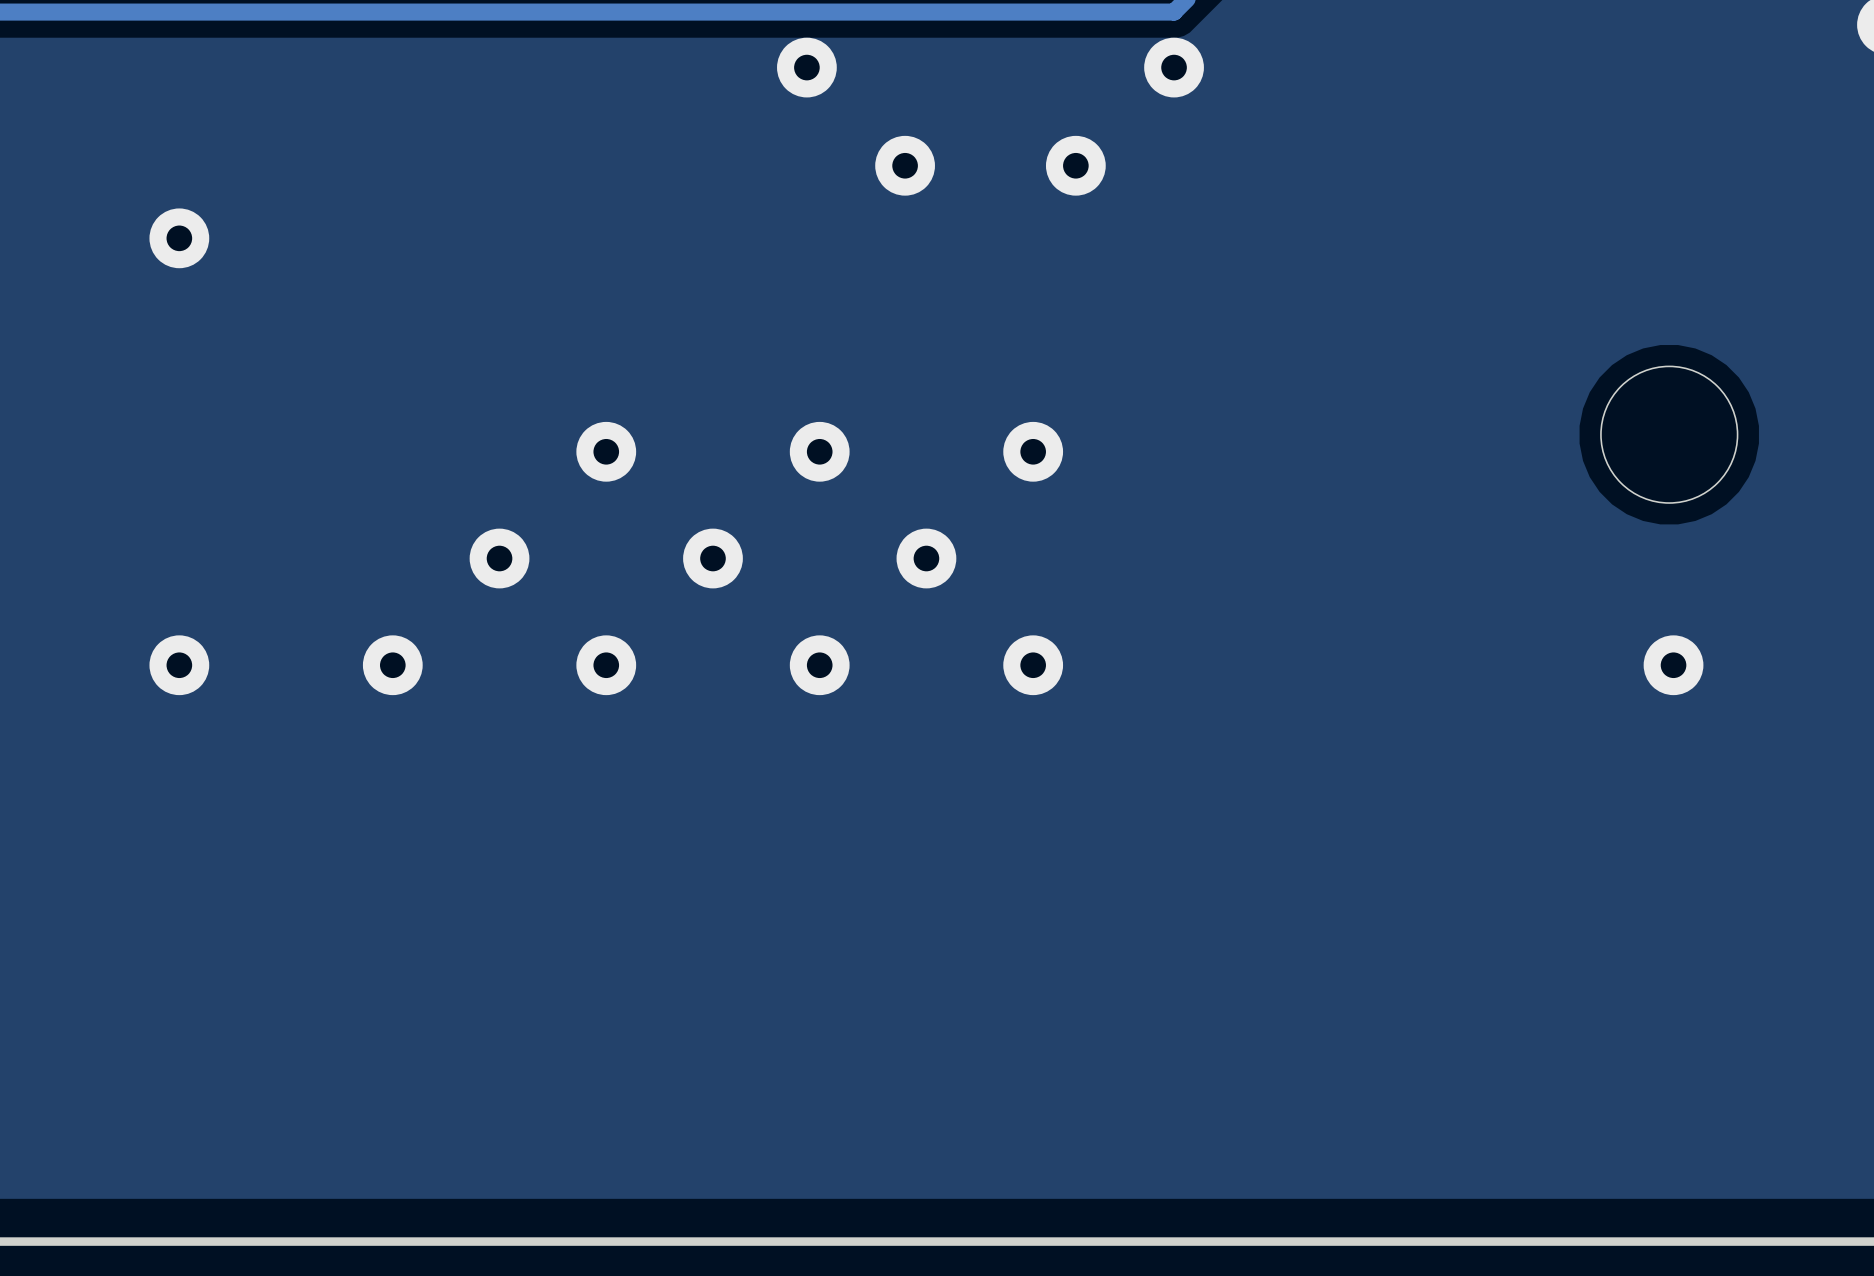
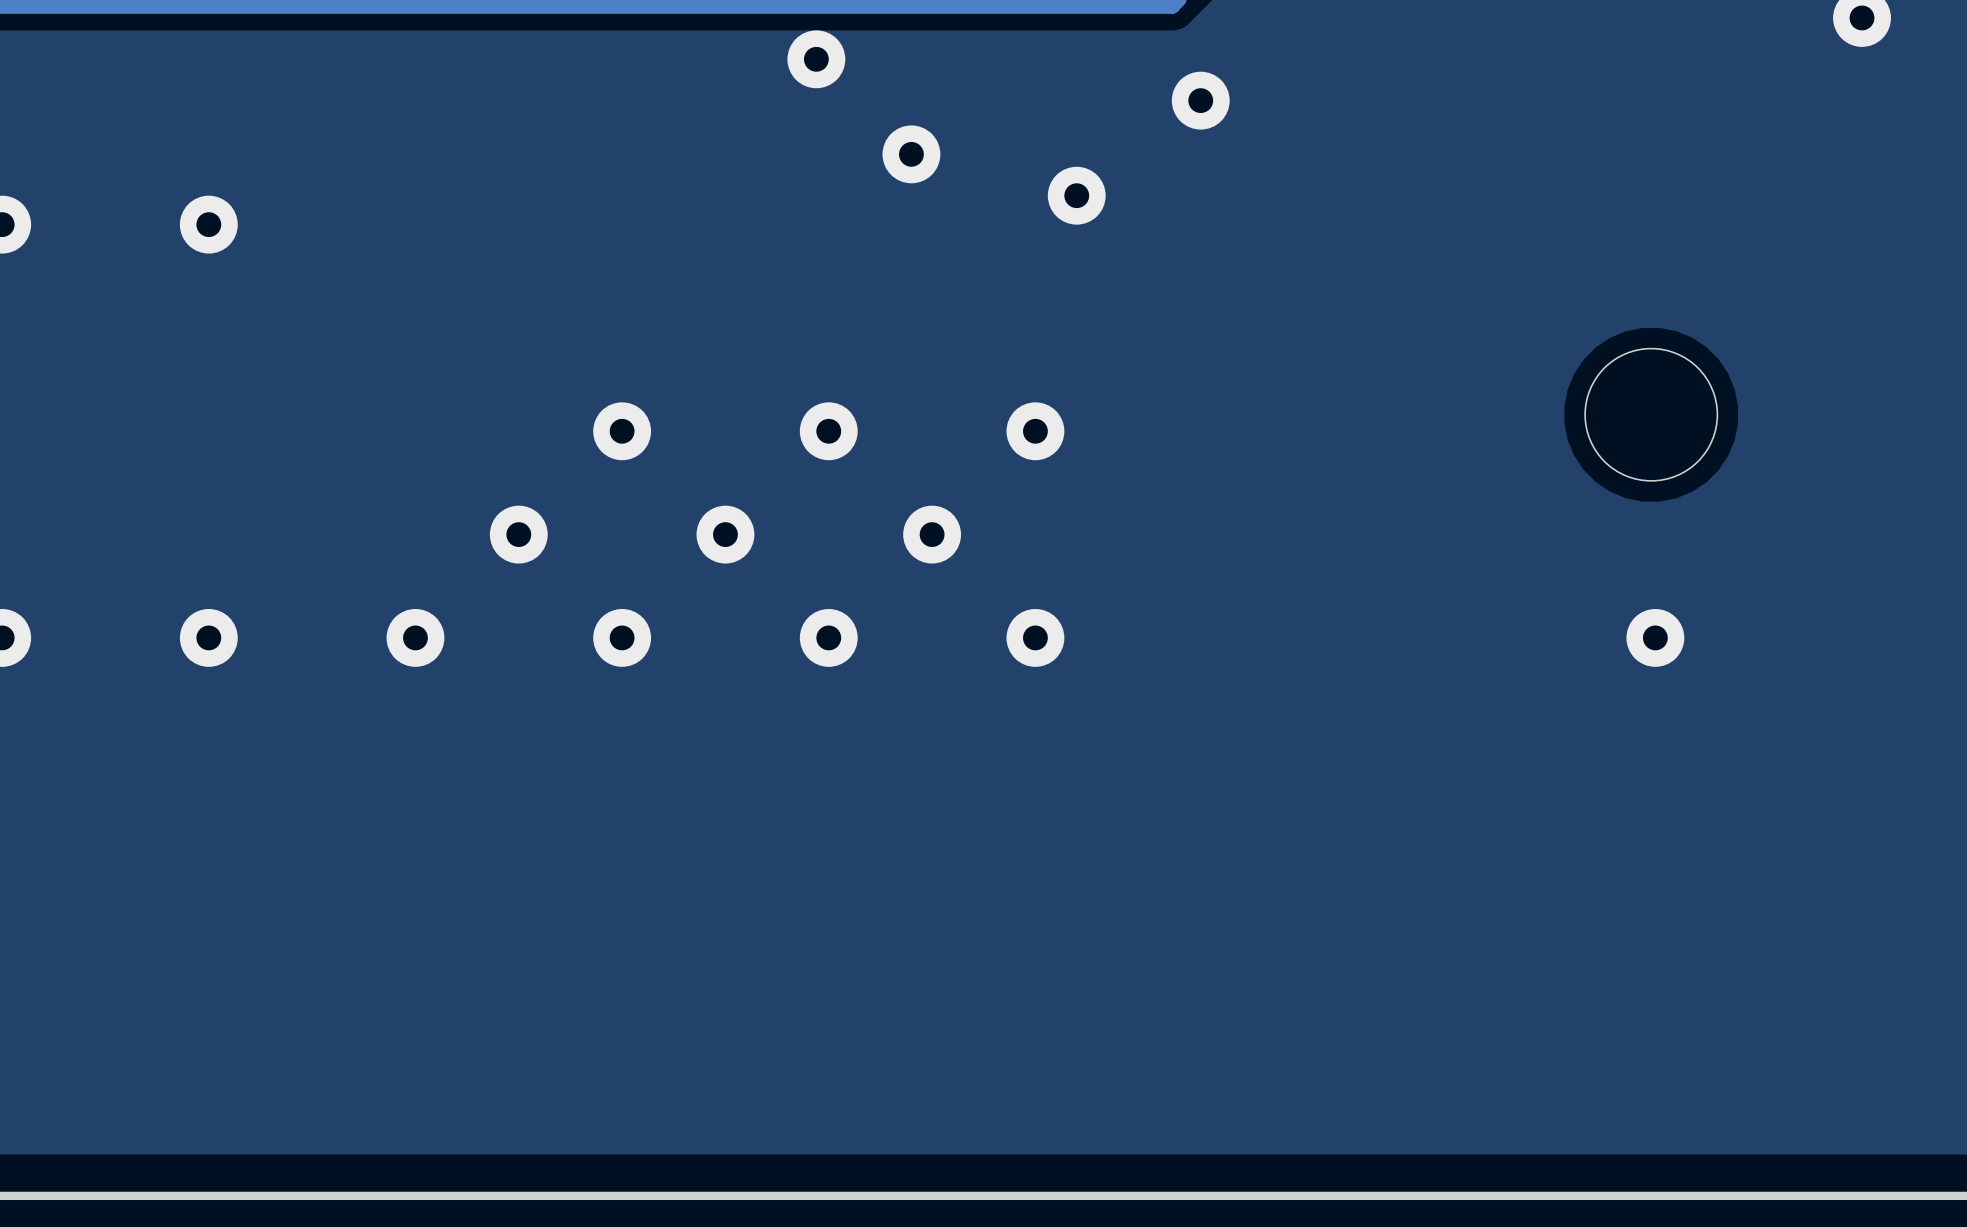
via position: (1174, 67) -> (1200, 100)
via position: (1075, 165) -> (1076, 195)

